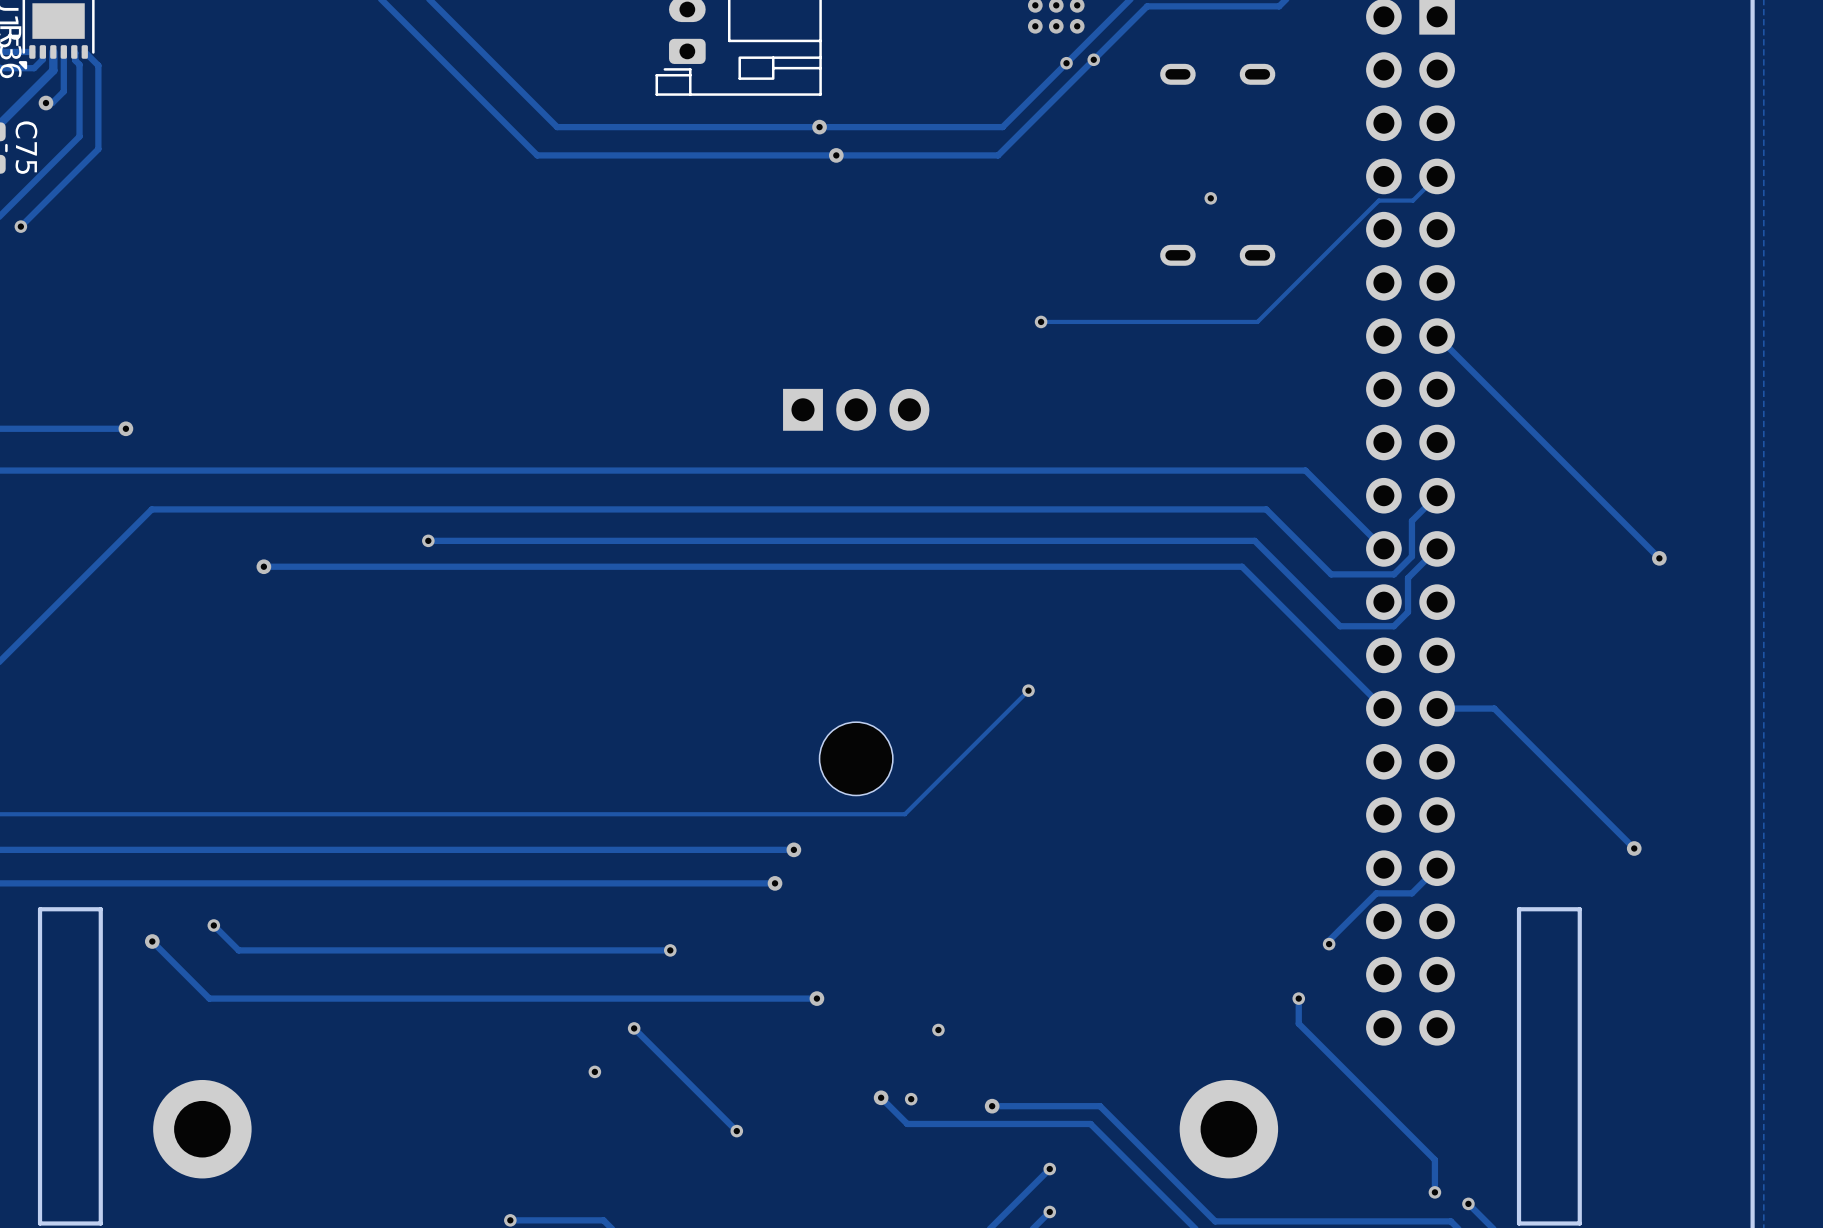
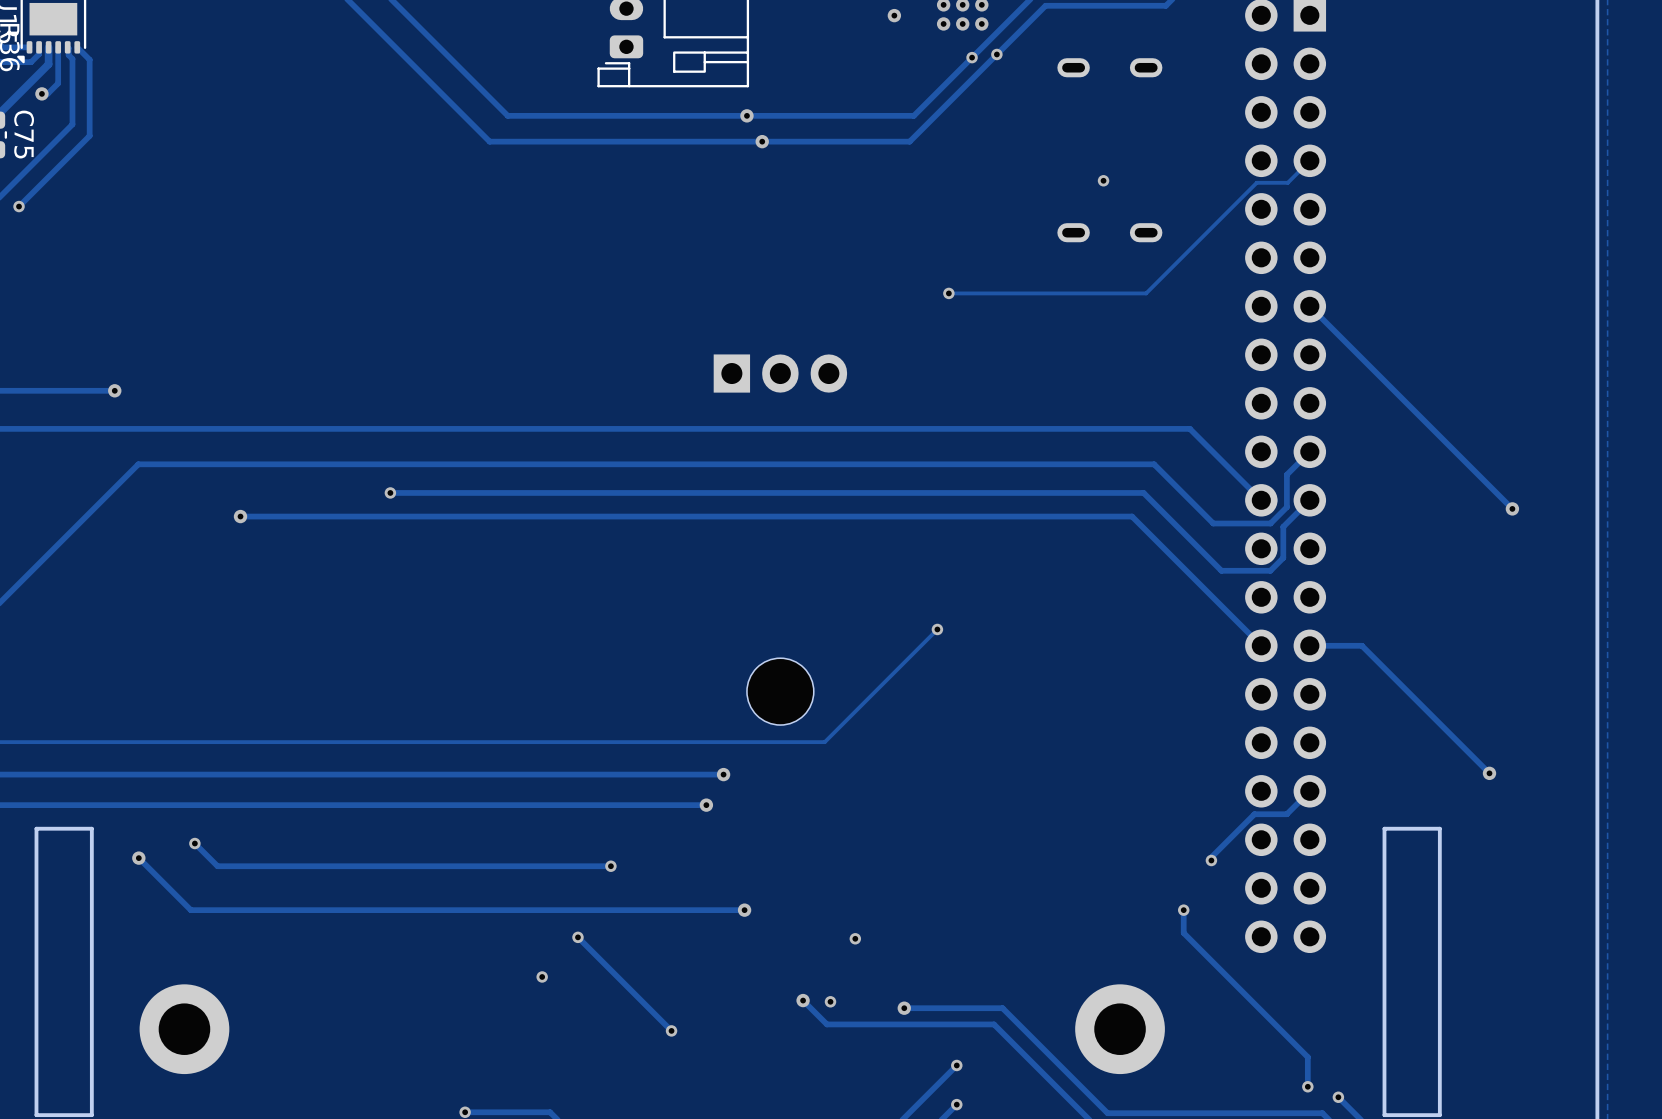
via: none -> (894, 15)

